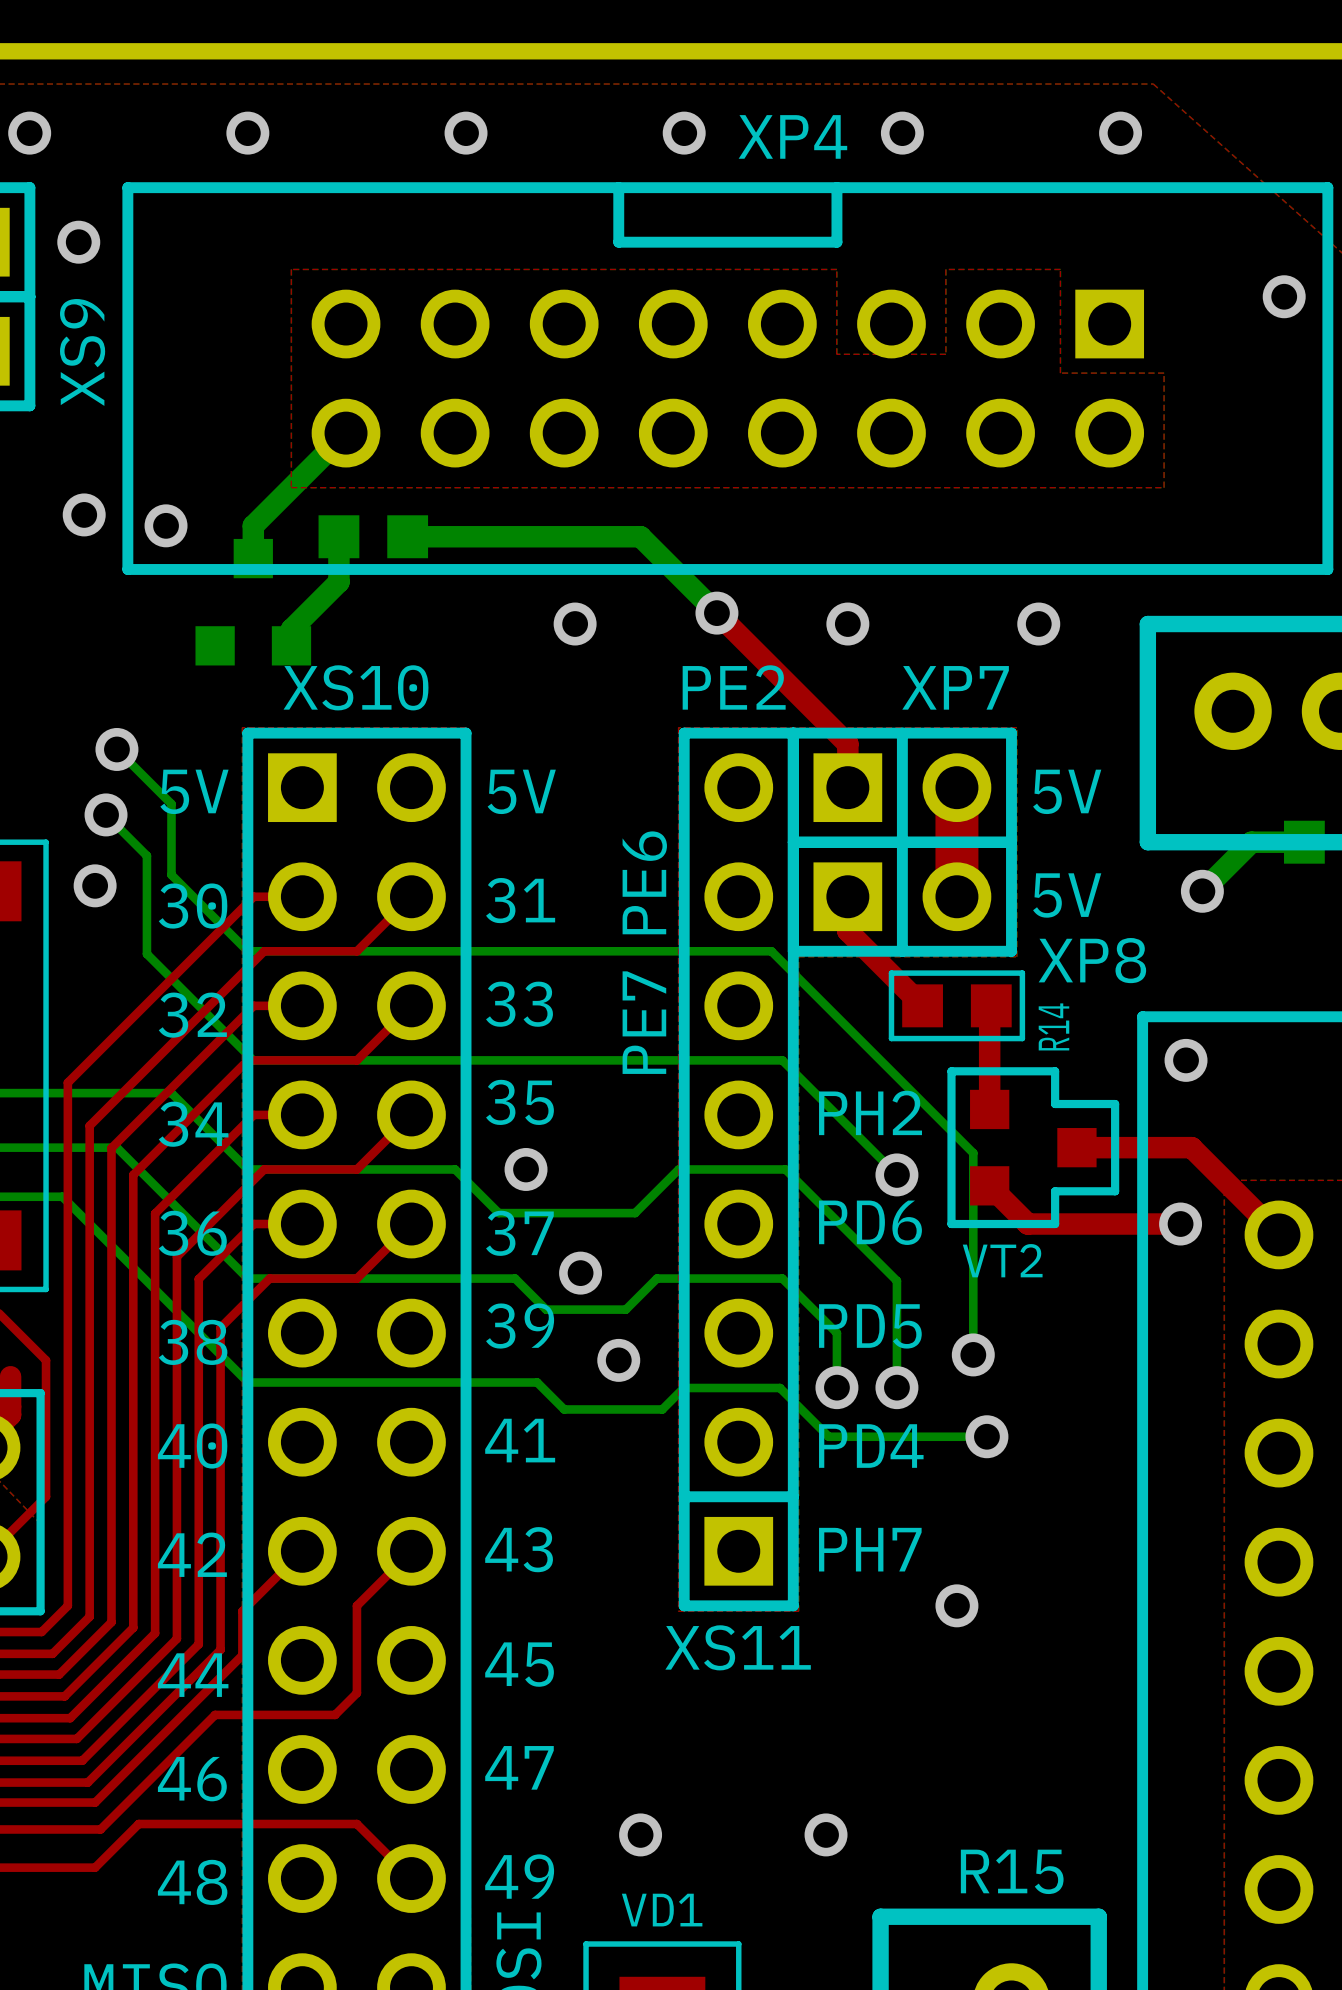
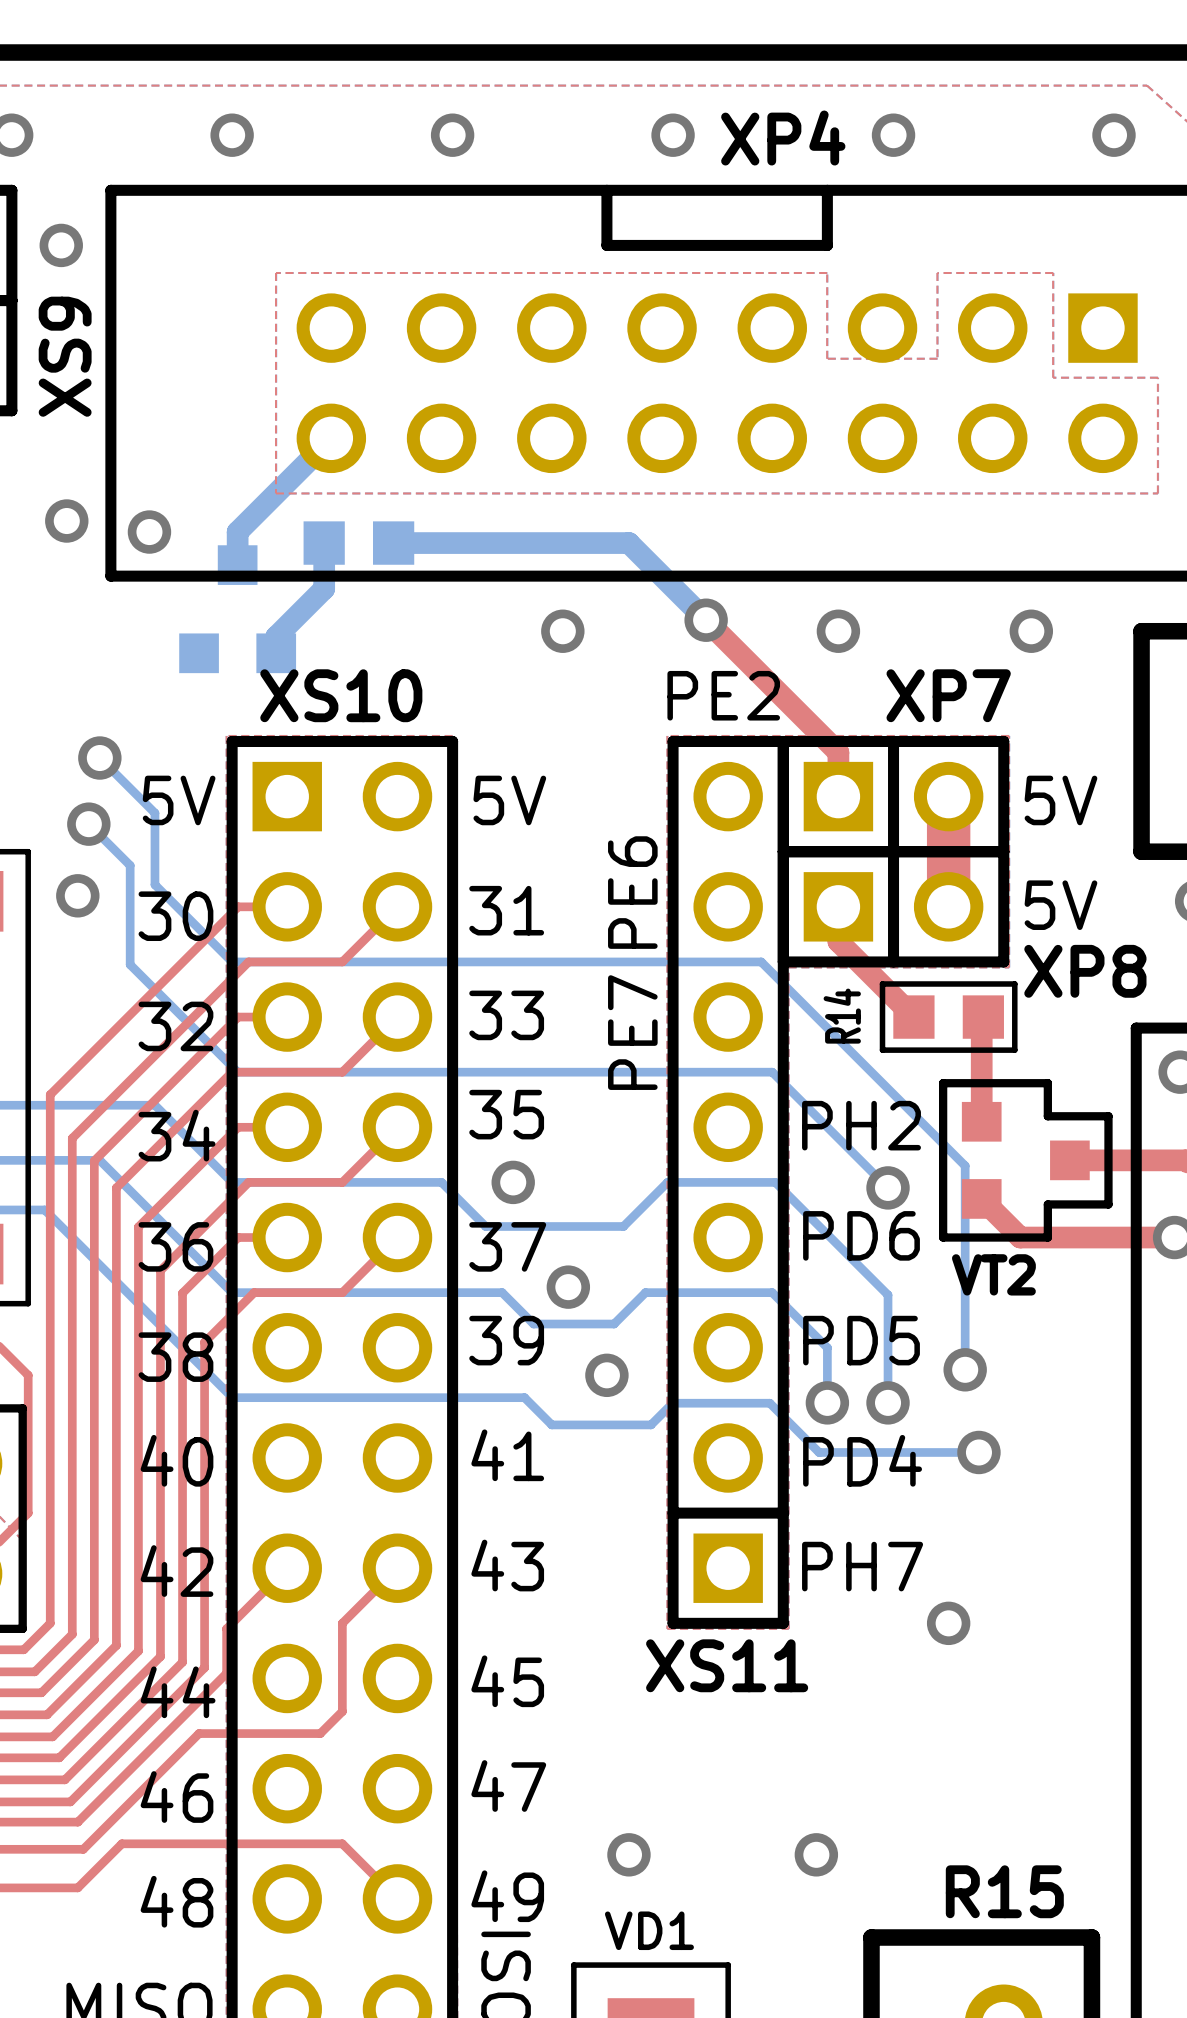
R14 name position: R14 (1053, 1026) -> R14 (842, 1016)

